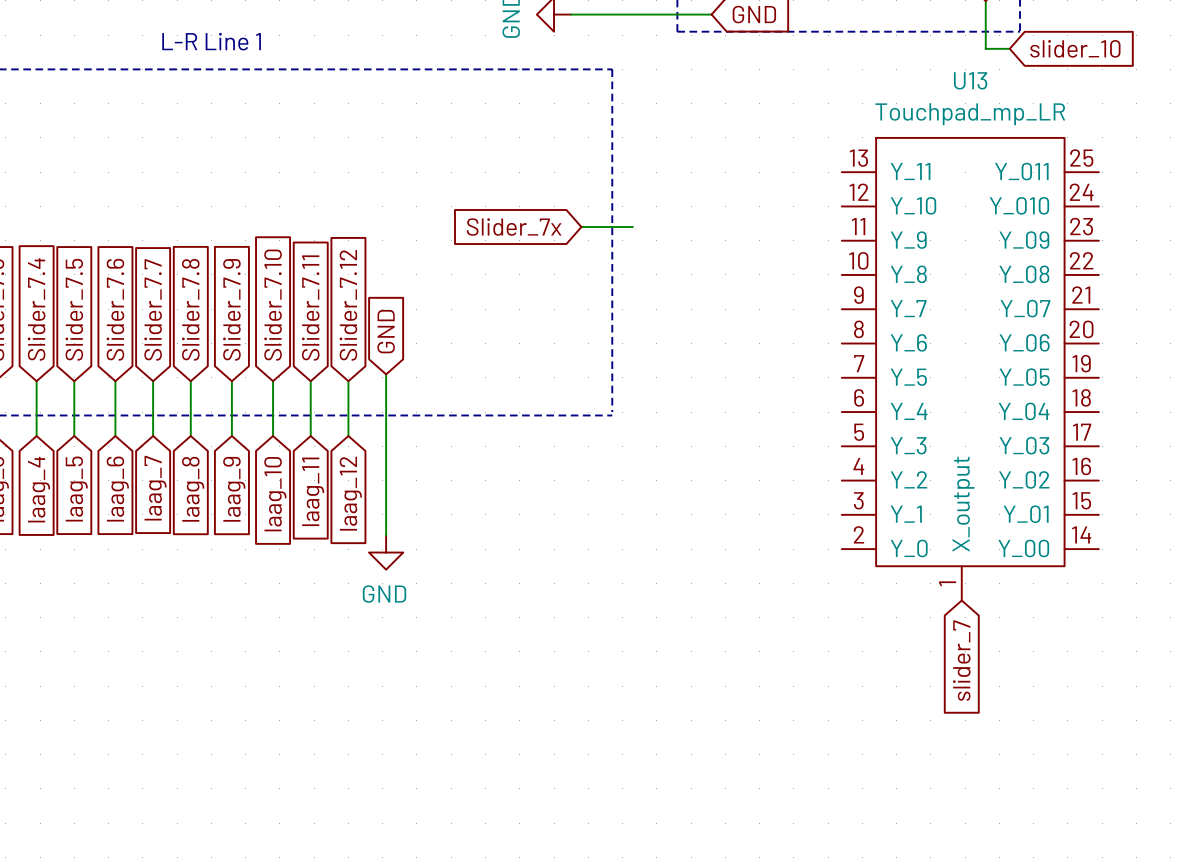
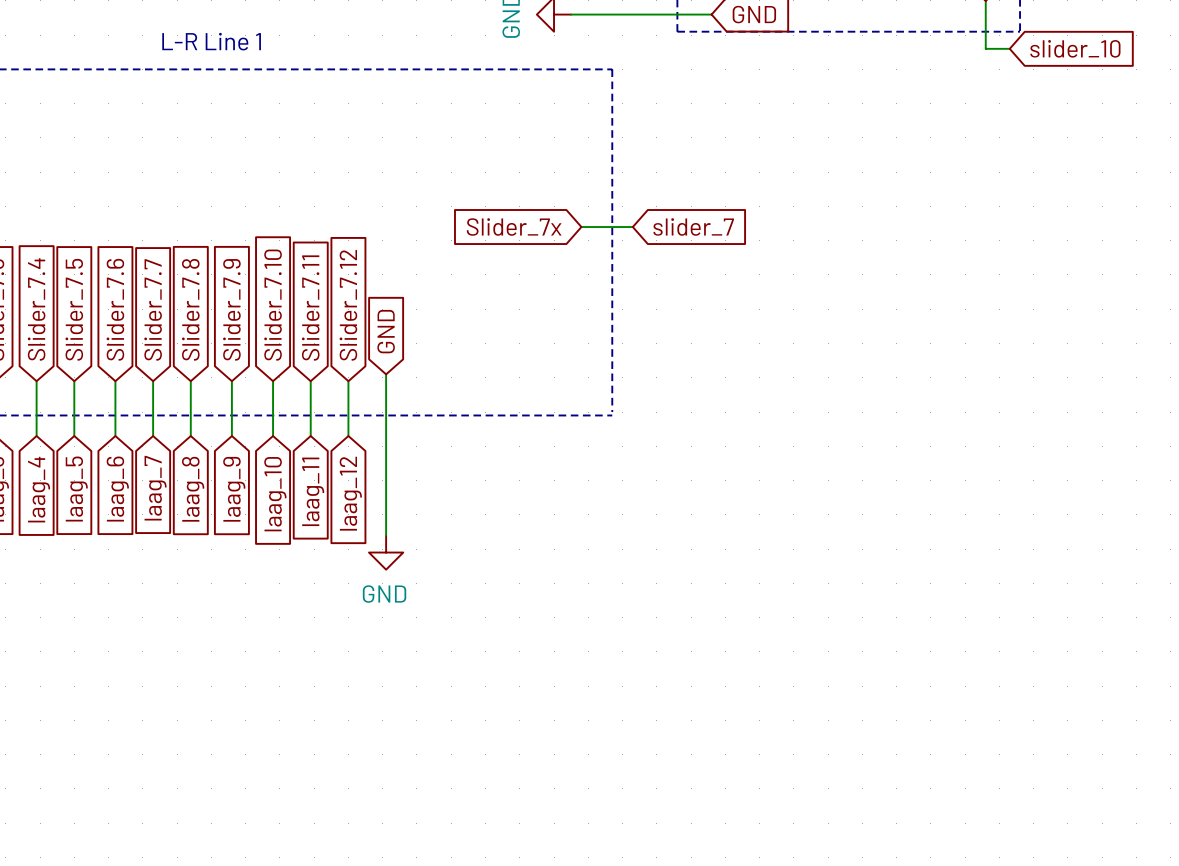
global label: none -> slider_7 (693, 227)
U13: Touchpad_mp_LR (970, 369) -> none
global label: slider_7 (961, 660) -> none

